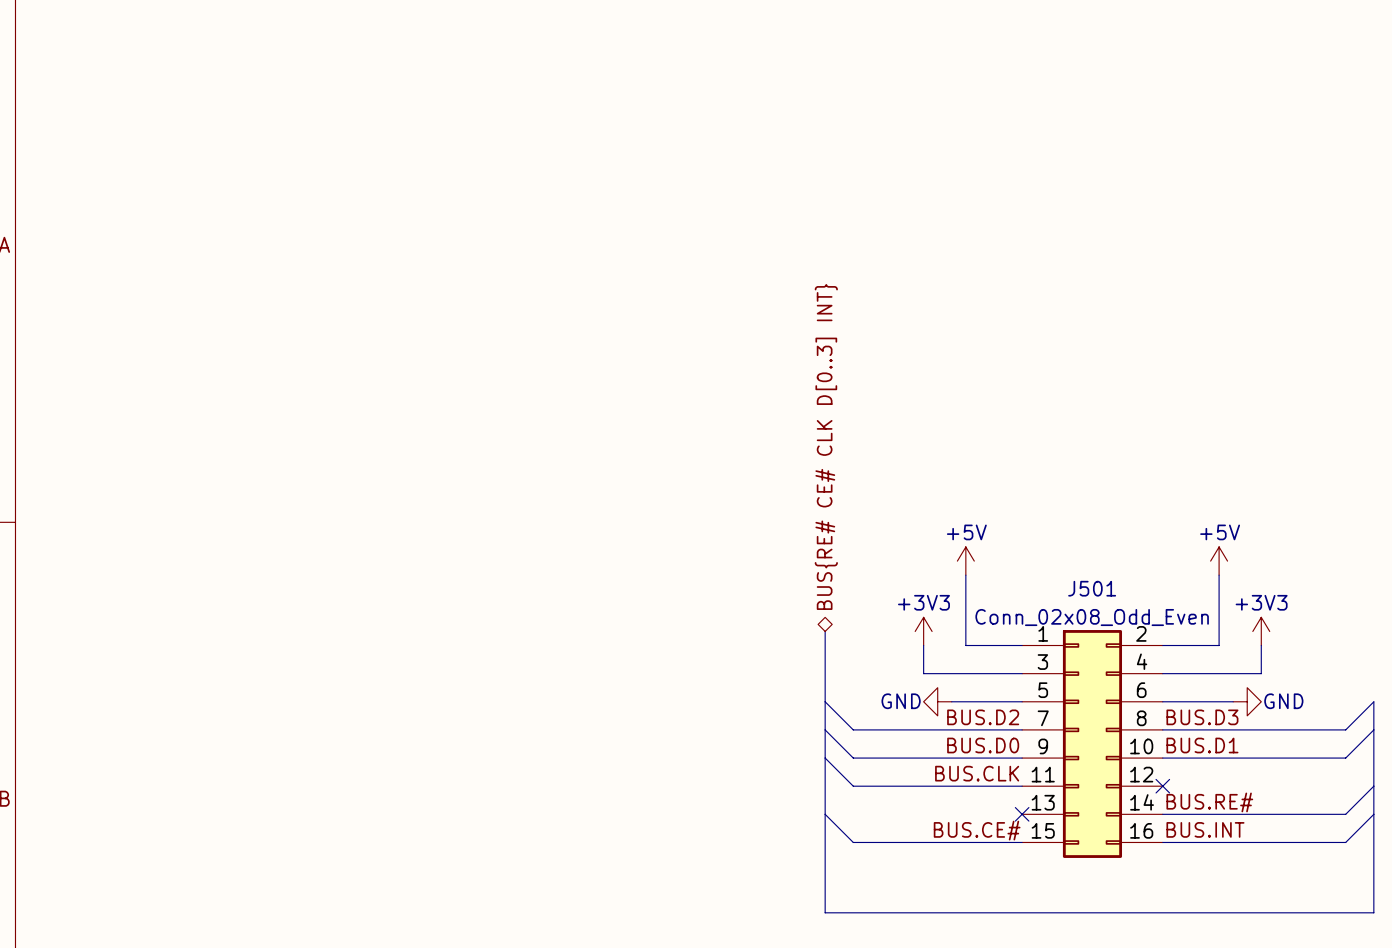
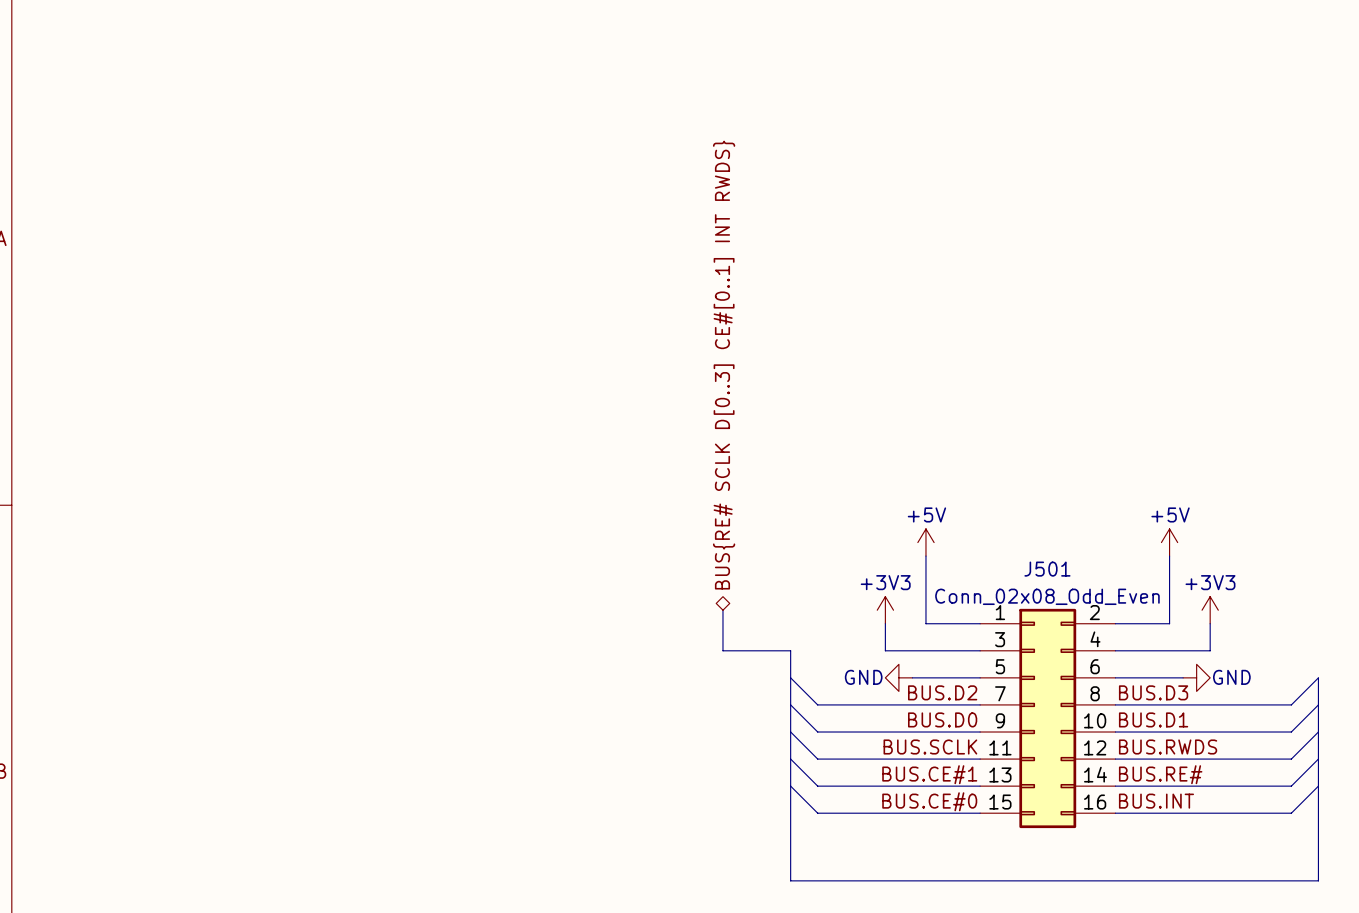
hierarchical label: none -> BUS{RE# SCLK D[0..3] CE#[0..1] INT RWDS} (724, 365)
hierarchical label: BUS{RE# CE# CLK D[0..3] INT} (826, 446) -> none
bus: (825, 631) (825, 673) -> (722, 610) (722, 650) (790, 650)
wire: none -> (1318, 732) (1291, 759) (1115, 759)
label: BUS.CLK (977, 773) -> BUS.SCLK (930, 746)
label: none -> BUS.RWDS (1168, 746)
wire: none -> (790, 759) (817, 786) (980, 786)
no-connect mark: (1162, 786) -> none
label: none -> BUS.CE#1 (929, 774)
no-connect mark: (1022, 814) -> none
label: BUS.CE# (977, 830) -> BUS.CE#0 (929, 801)

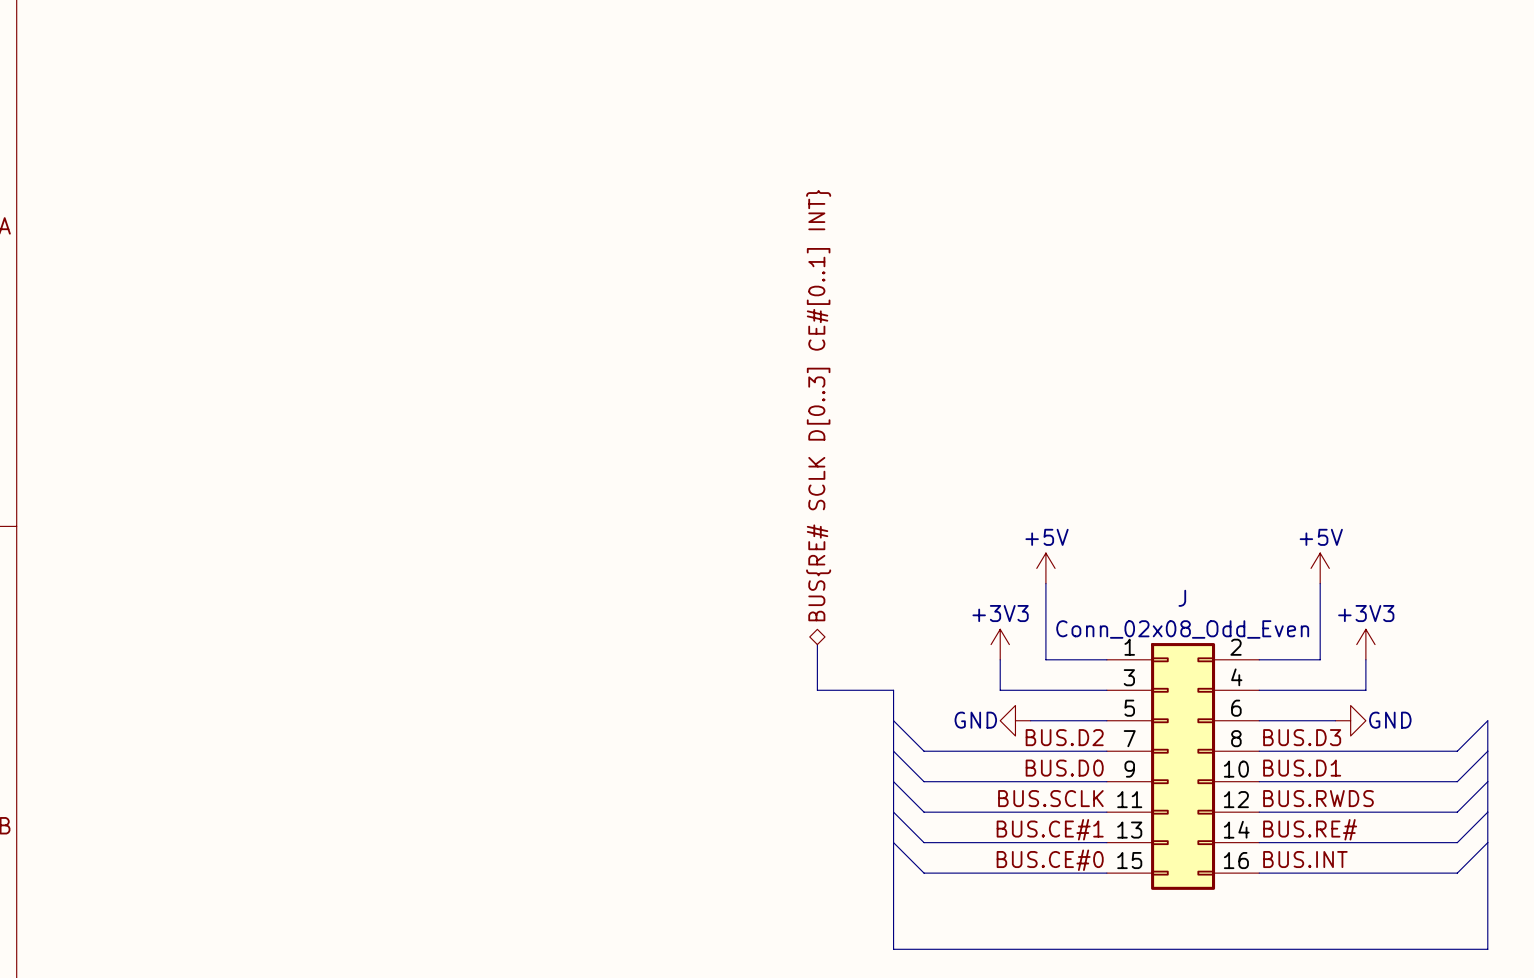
hierarchical label: BUS{RE# SCLK D[0..3] CE#[0..1] INT RWDS} (724, 365) -> BUS{RE# SCLK D[0..3] CE#[0..1] INT} (818, 405)
J501 name: J501 (1047, 569) -> J (1182, 598)

